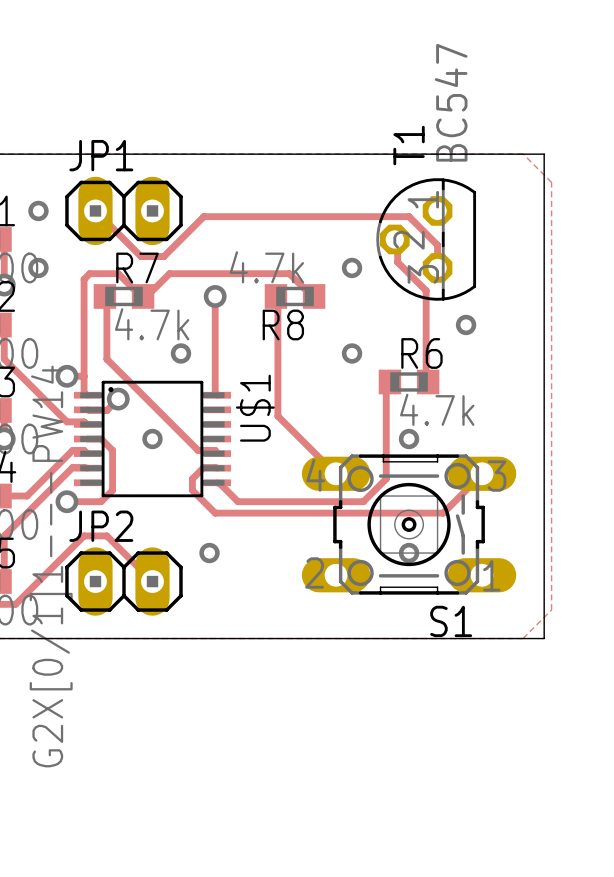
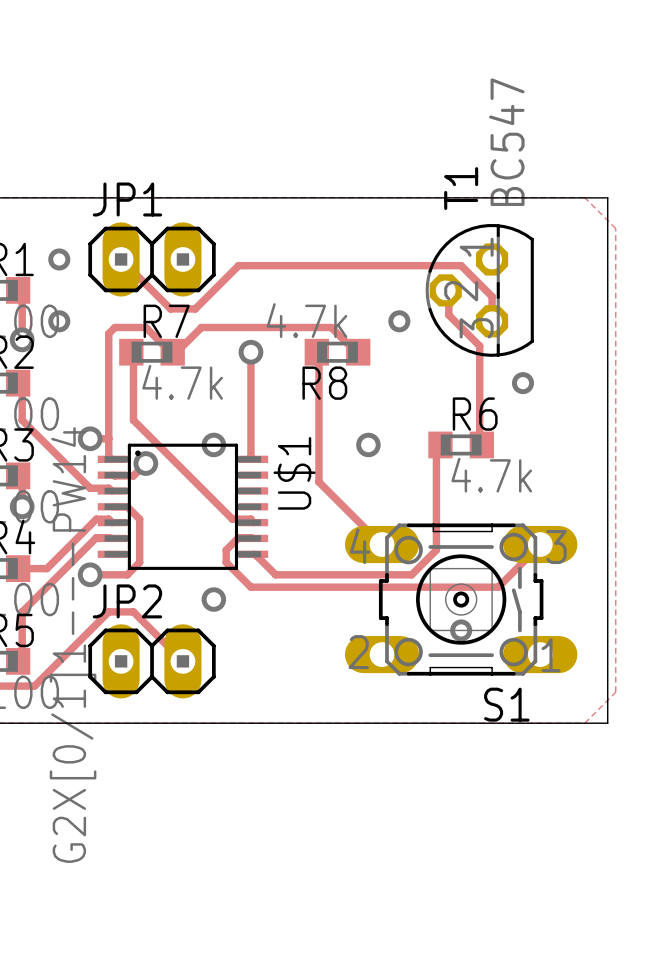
via: (181, 353) -> none
via: (352, 353) -> none
via: none -> (213, 444)
via: none -> (368, 444)
via: (152, 439) -> none
via: (409, 439) -> none
via: none -> (213, 599)
via: (209, 553) -> none

